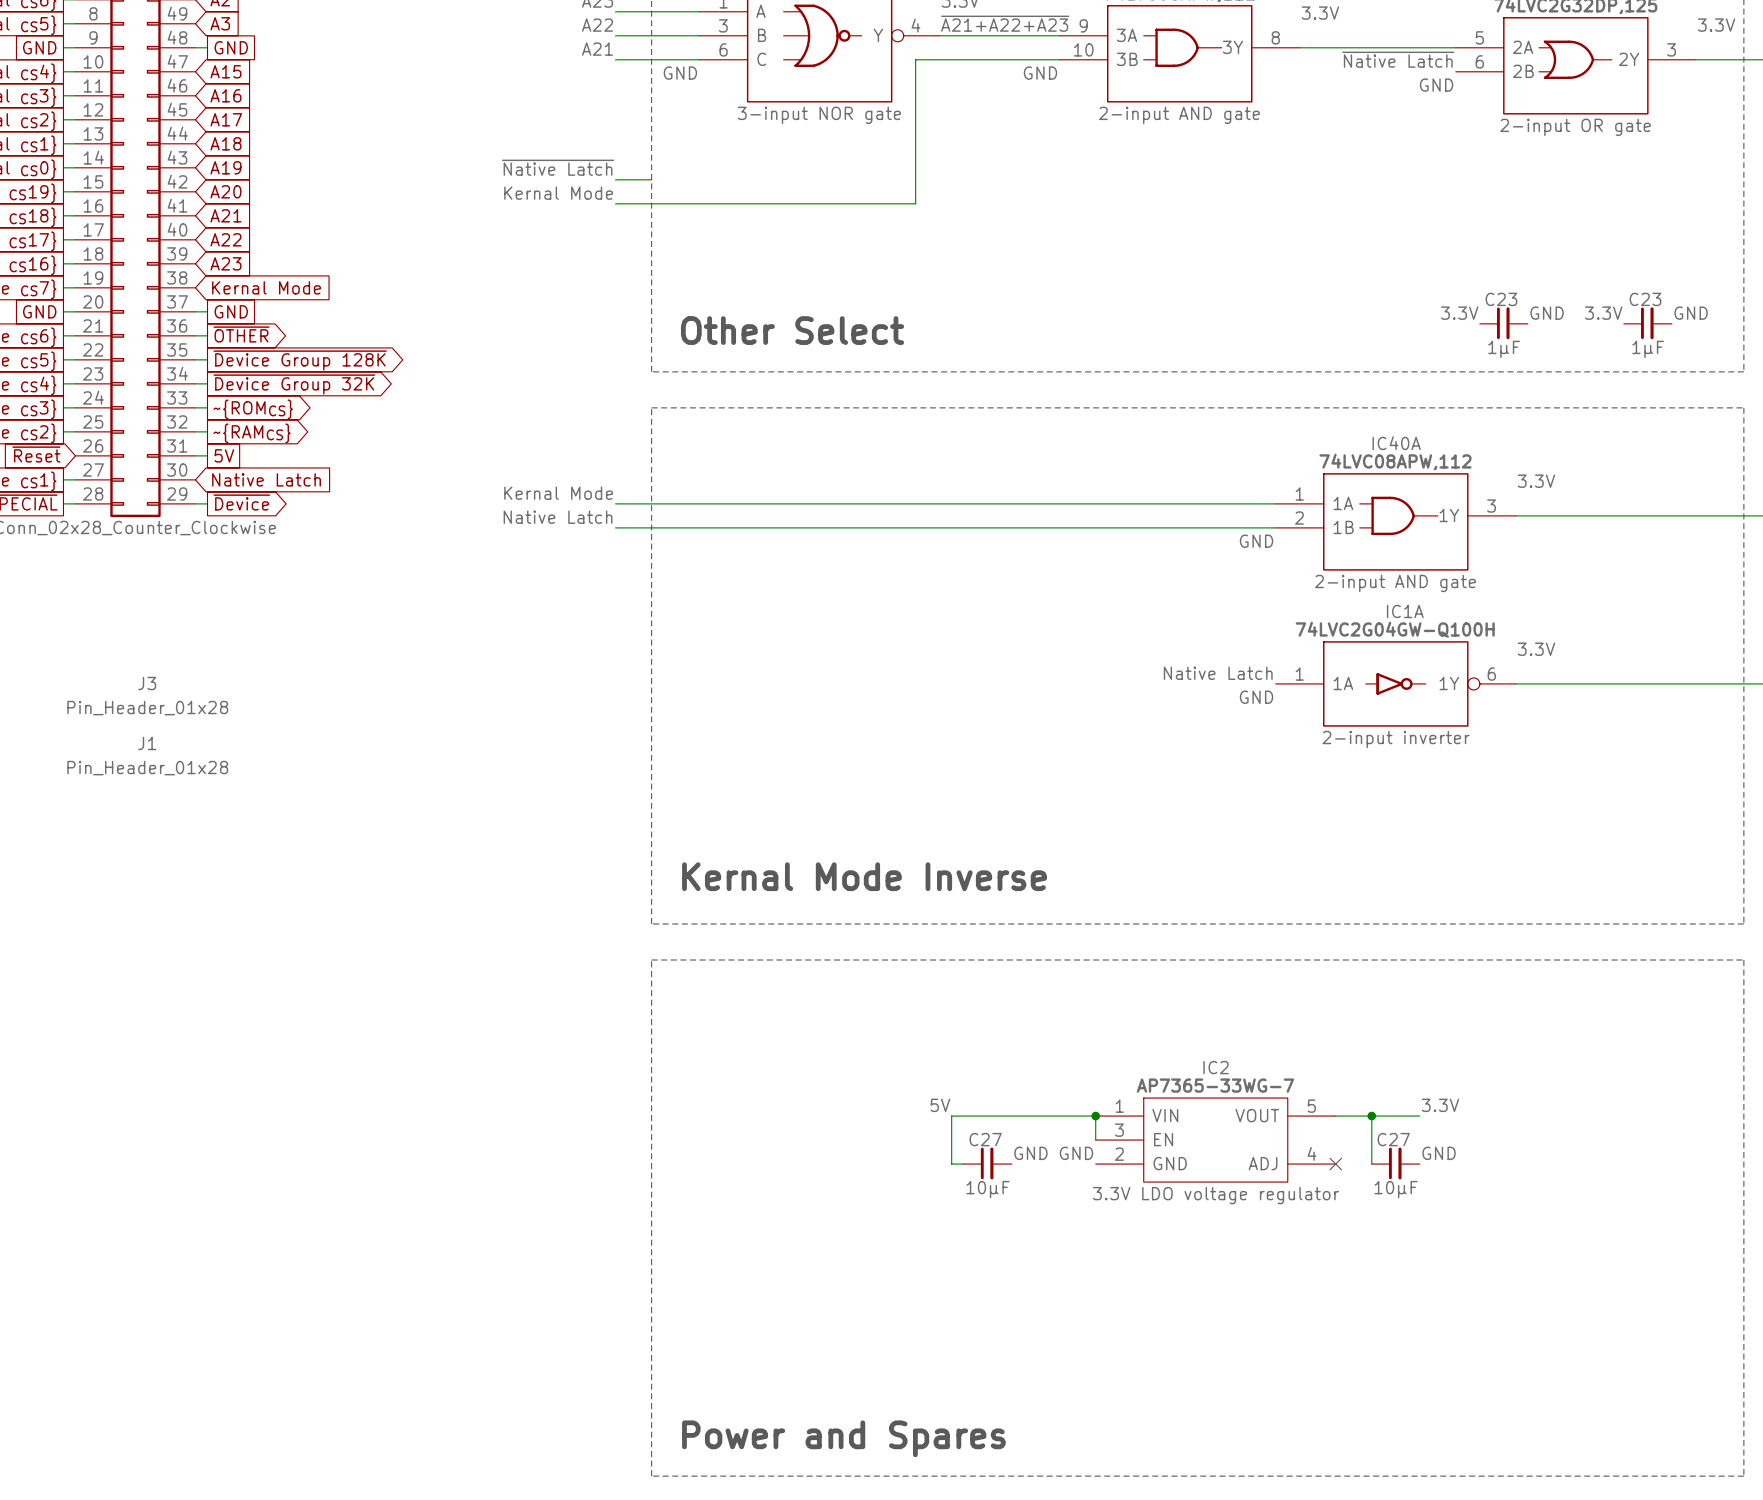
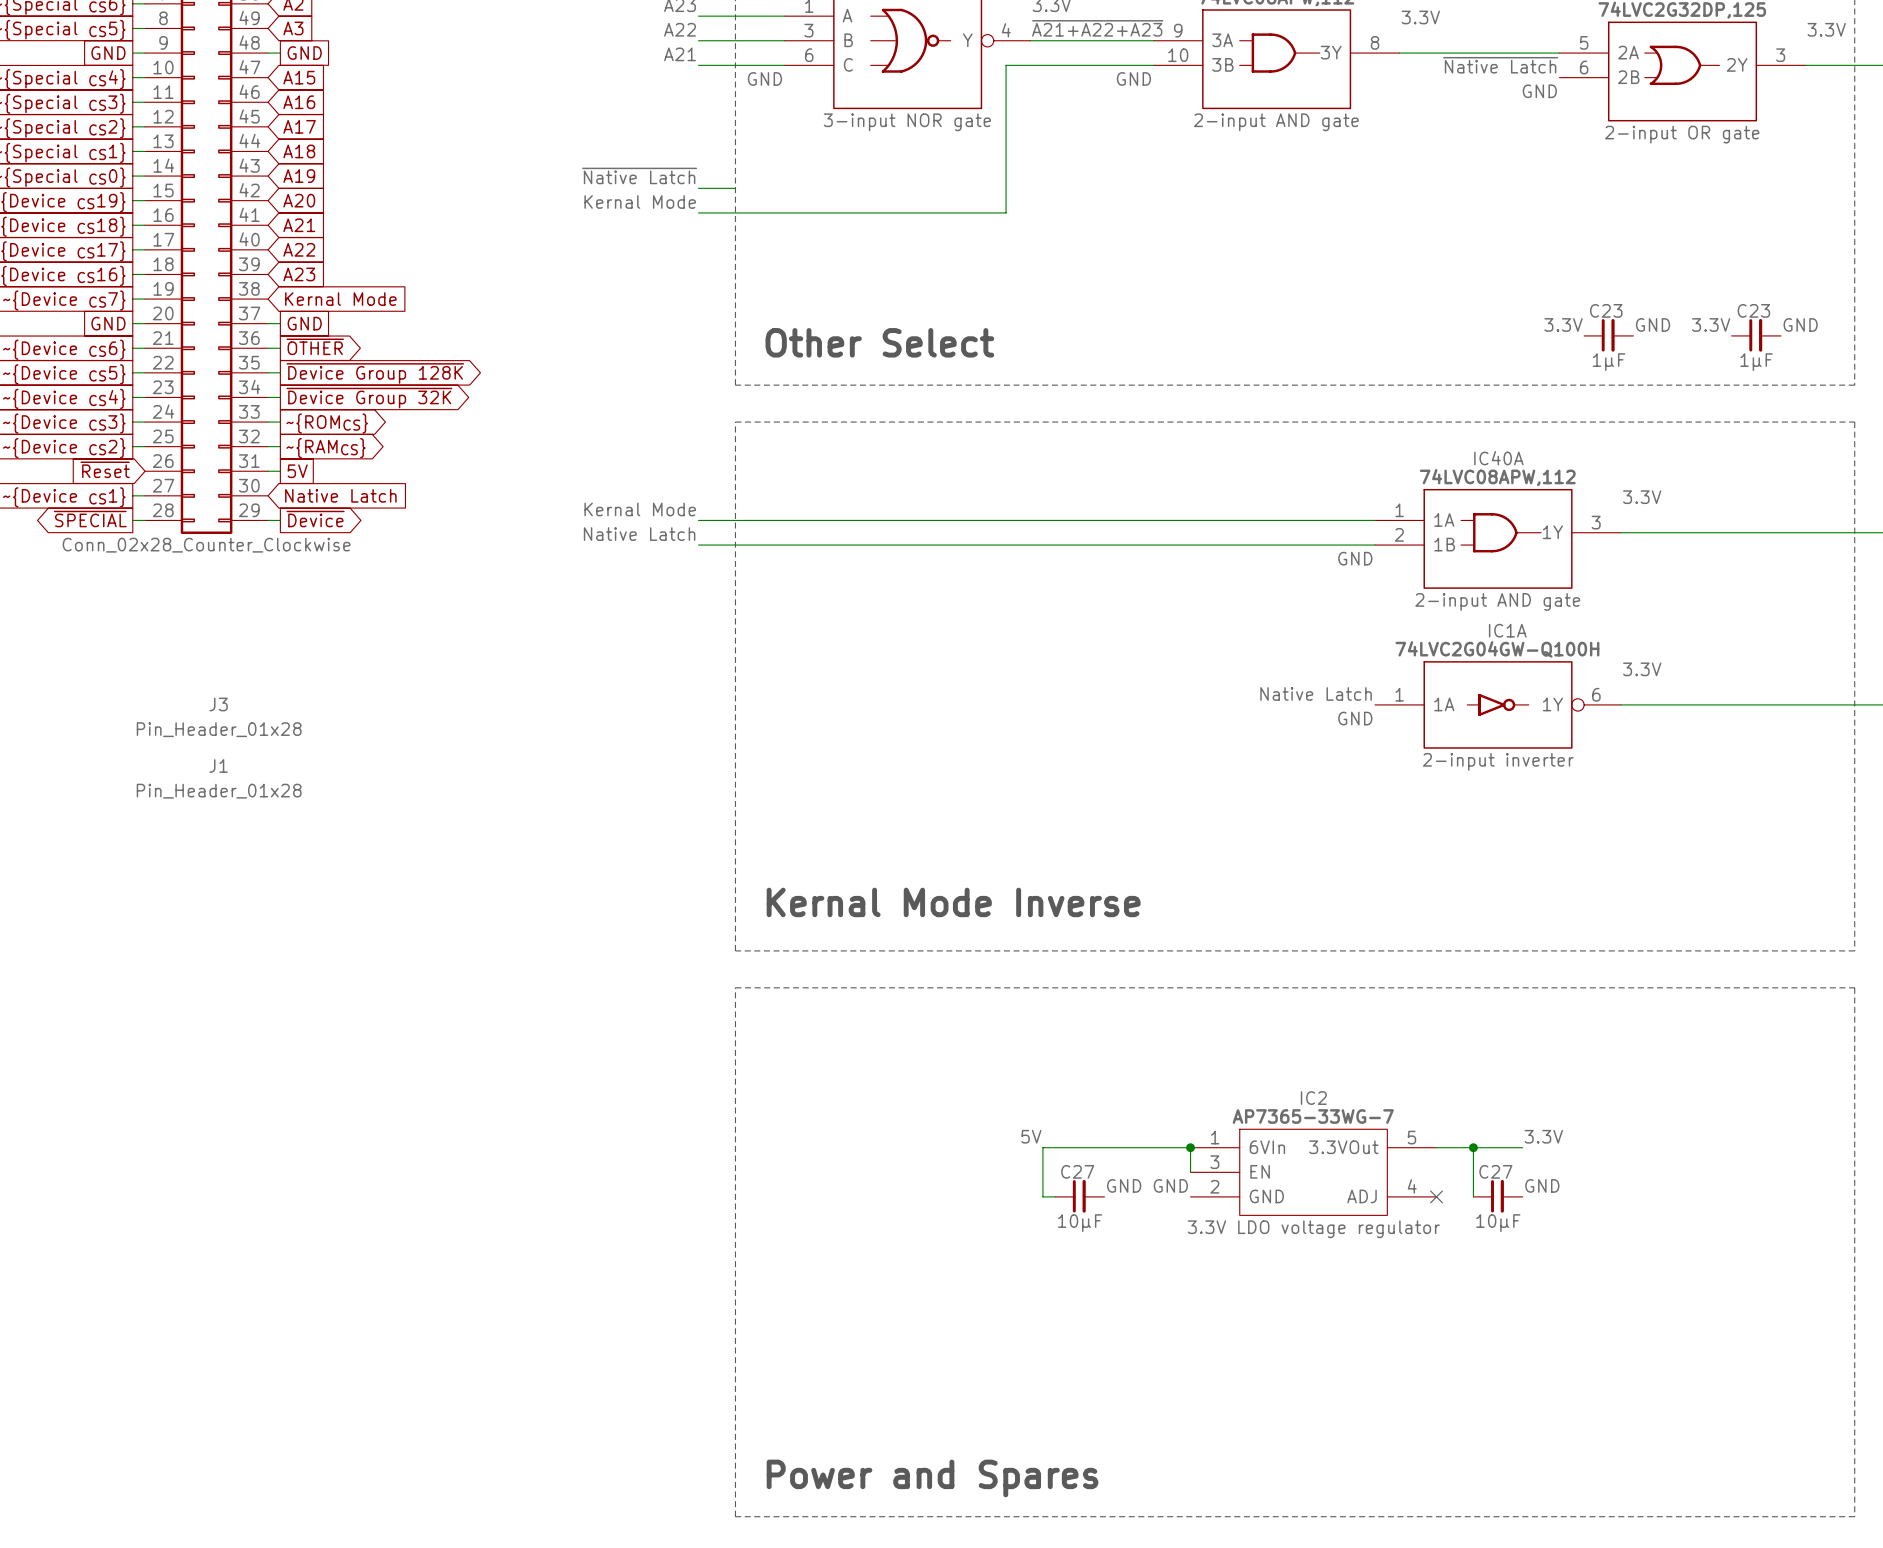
IC2 pin name: VIN (1165, 1115) -> 6VIn (1267, 1147)
IC2 pin name: VOUT (1257, 1115) -> 3.3VOut (1343, 1147)

